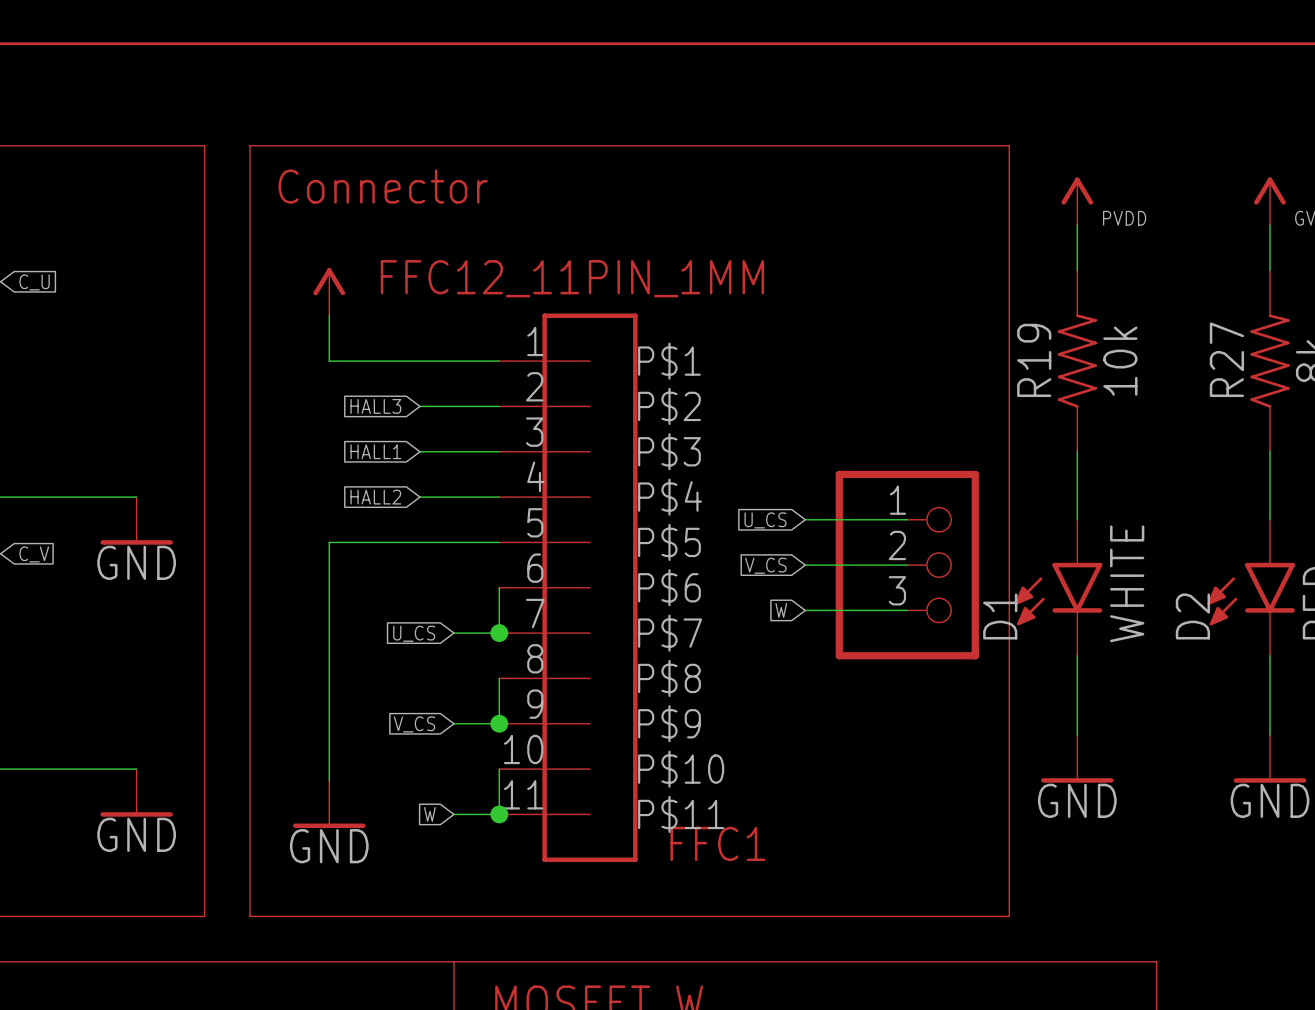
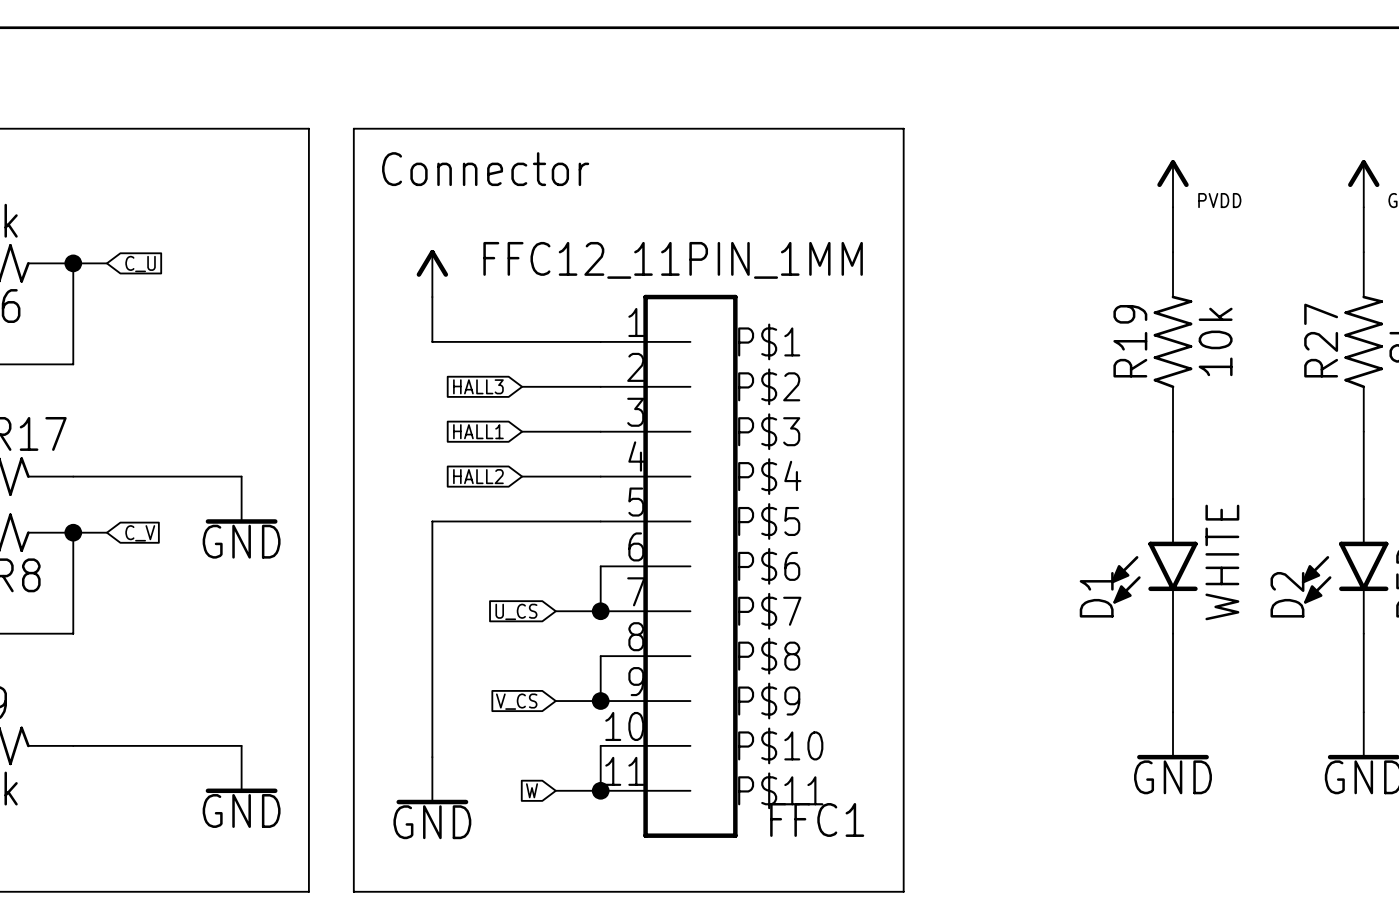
line: (805, 145) (1009, 145) (1009, 916) (805, 916) -> (903, 128) (903, 891)
wire: (805, 519) (907, 519) -> none
global label: U_CS (765, 520) -> none
global label: V_CS (765, 565) -> none
wire: (805, 565) (907, 565) -> none
part: (907, 565) -> none
global label: W (781, 610) -> none
wire: (805, 610) (907, 610) -> none

